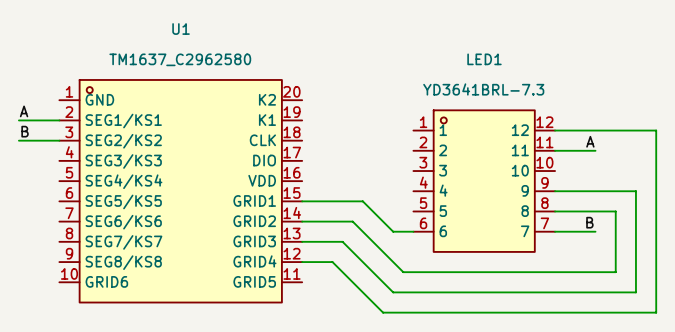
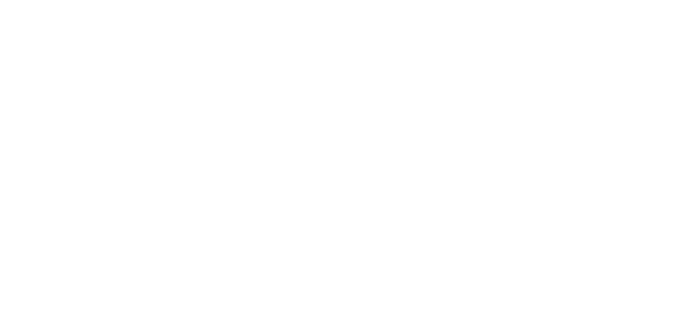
label: A (24, 111) -> none
wire: (18, 120) (59, 120) -> none
wire: (555, 130) (656, 130) (656, 312) (383, 312) (332, 262) (302, 262) -> none
label: B (25, 131) -> none
wire: (18, 140) (59, 140) -> none
label: A (590, 141) -> none
wire: (555, 150) (595, 150) -> none
LED1: YD3641BRL-7.3 (484, 181) -> none
U1: TM1637_C2962580 (180, 191) -> none
wire: (555, 191) (635, 191) (635, 292) (393, 292) (342, 241) (302, 241) -> none
wire: (302, 201) (362, 201) (393, 231) (413, 231) -> none
wire: (555, 211) (615, 211) (615, 272) (403, 272) (352, 221) (302, 221) -> none
label: B (589, 222) -> none
wire: (555, 231) (595, 231) -> none

